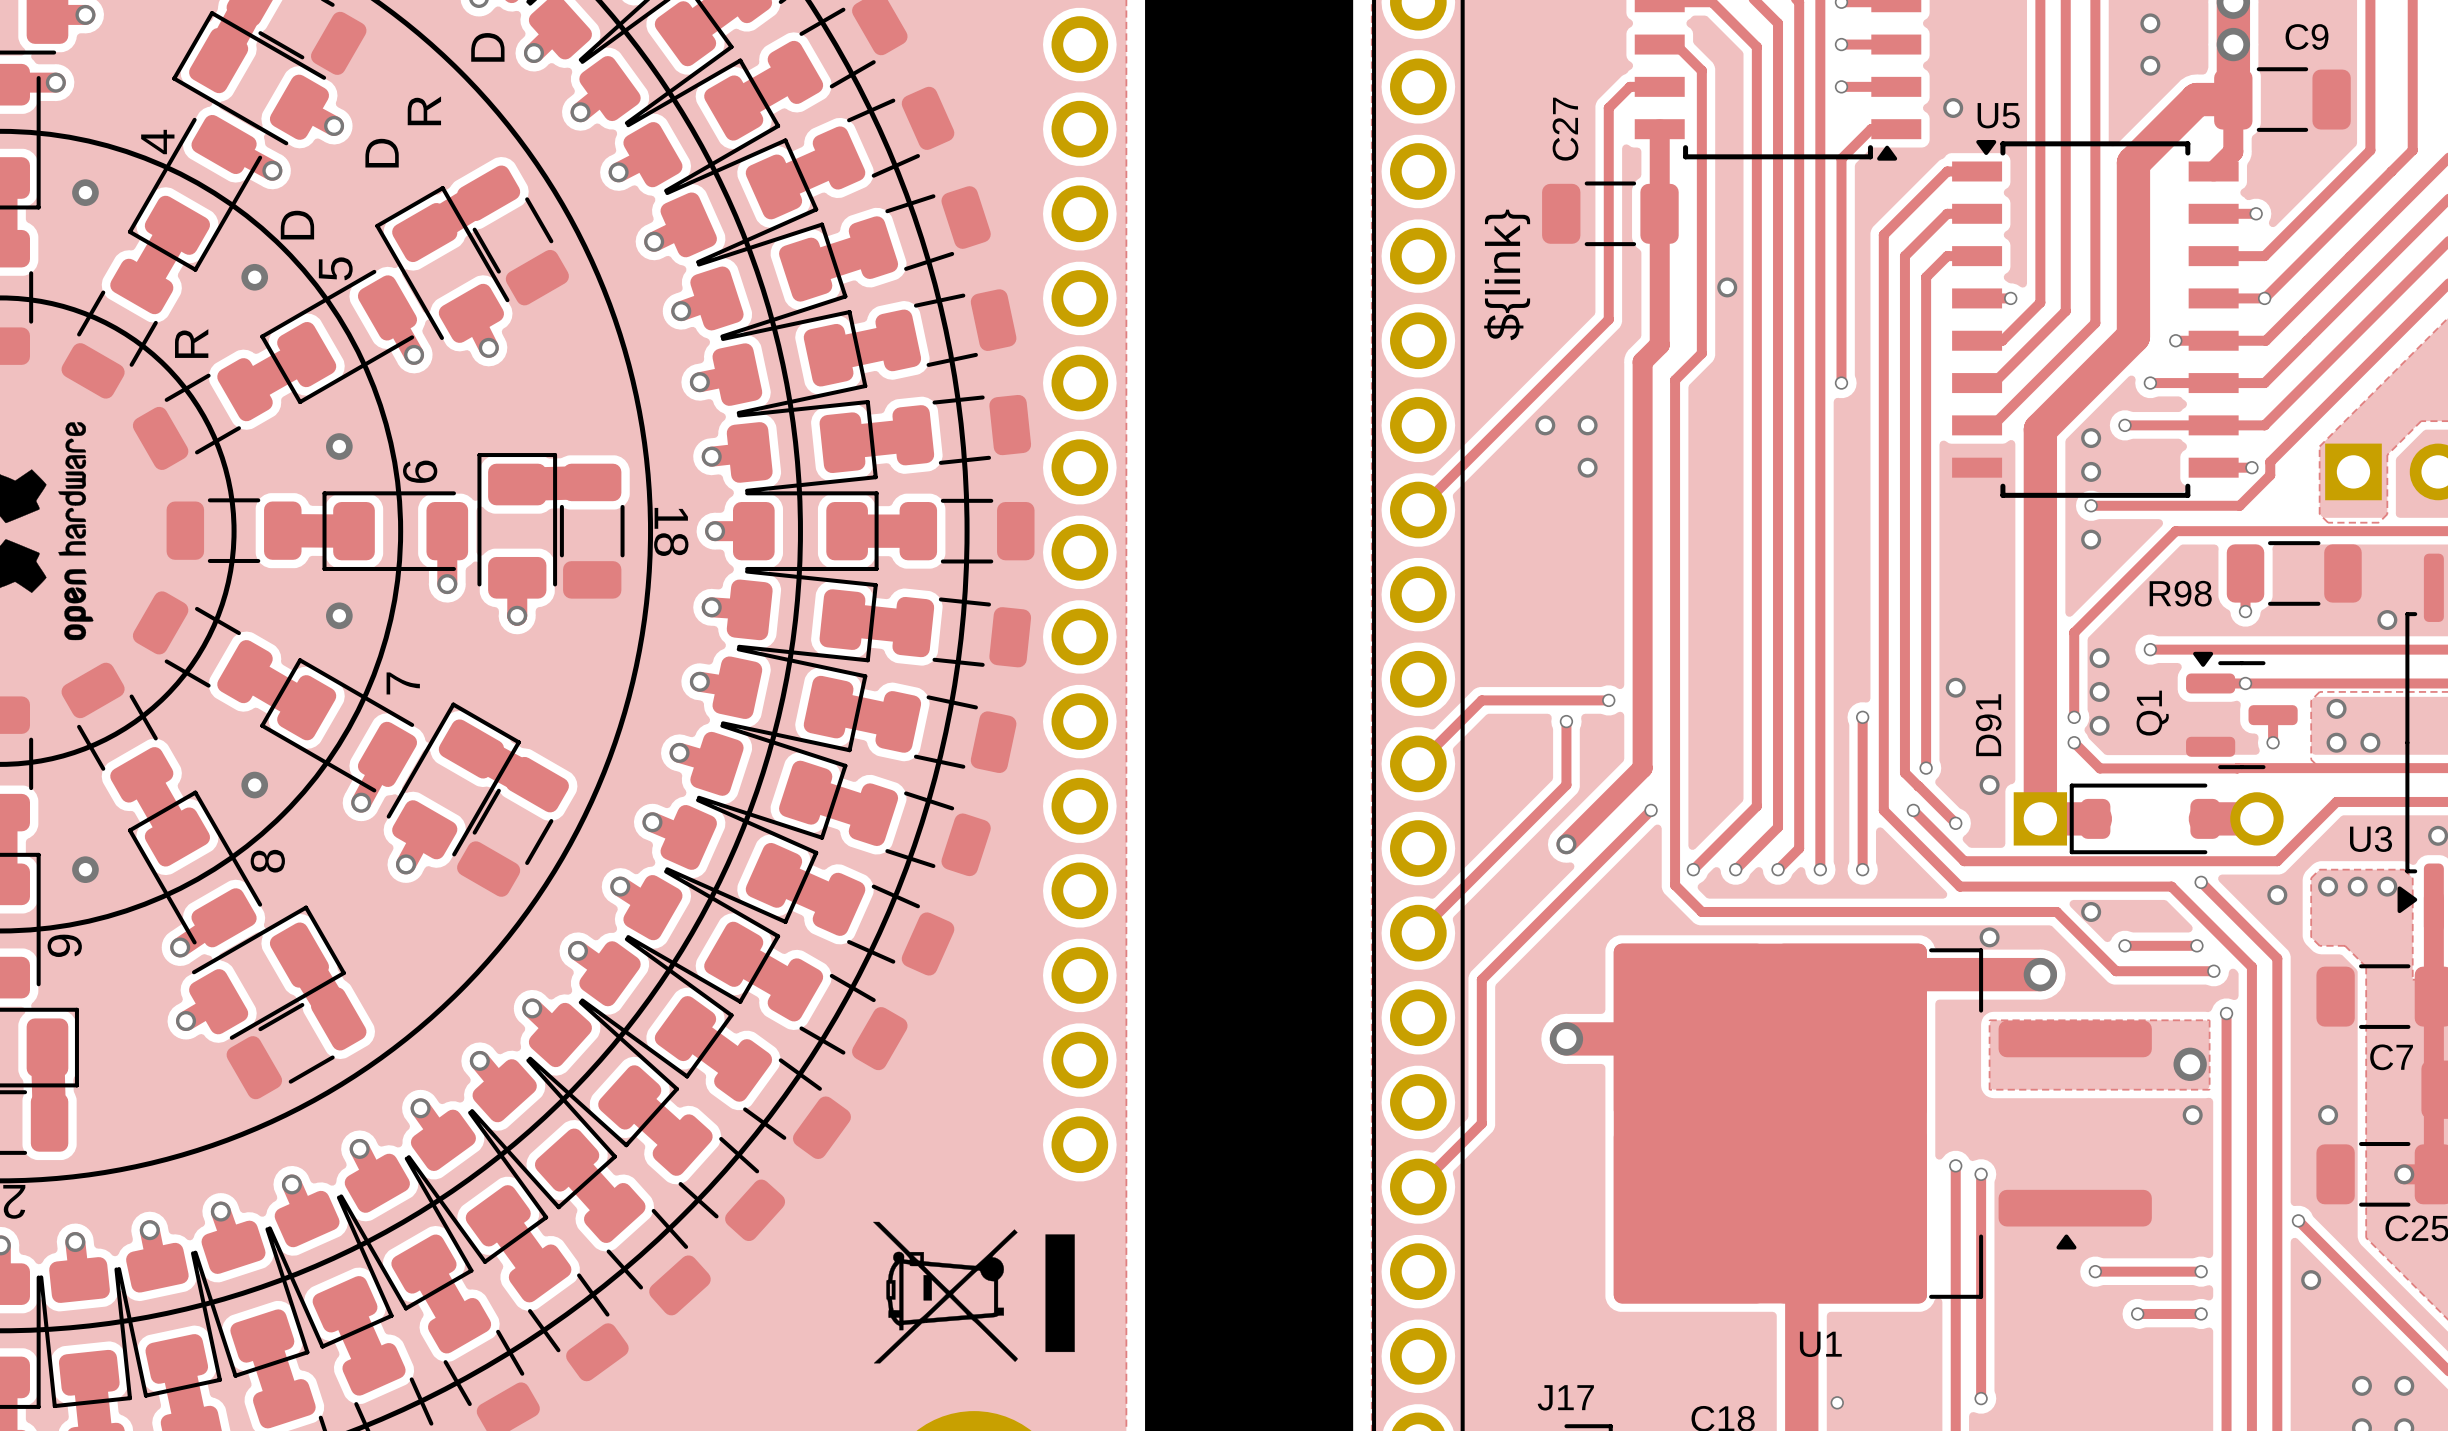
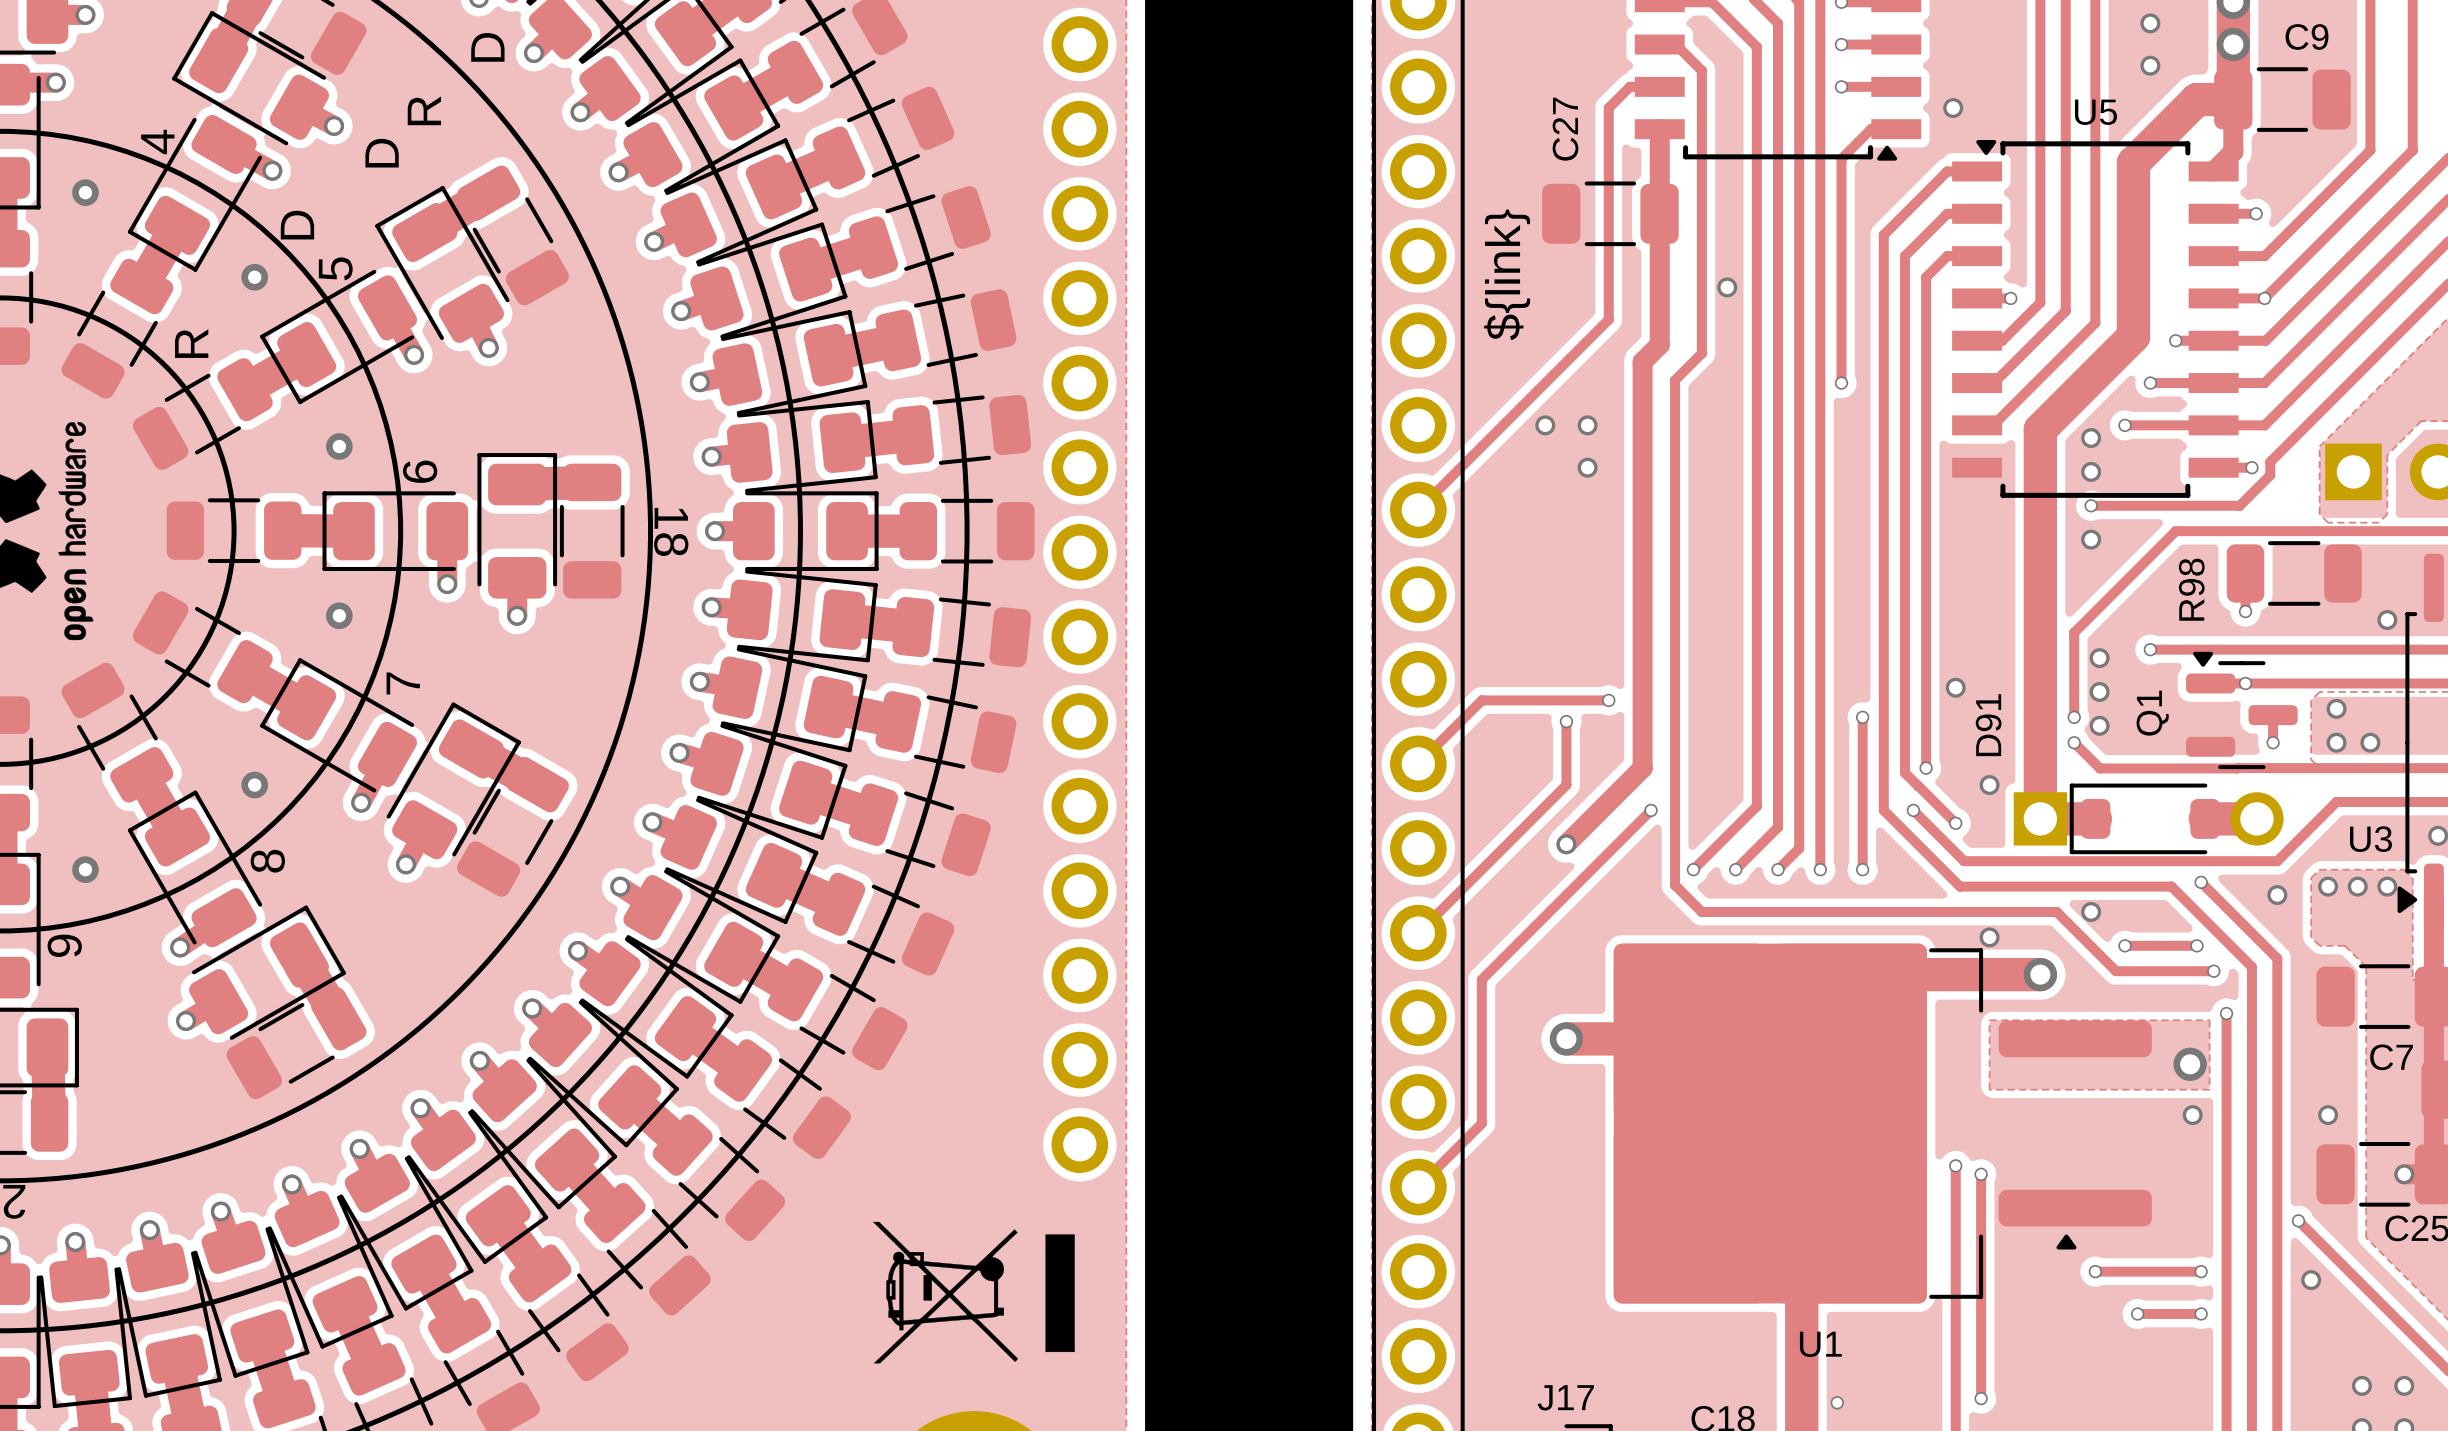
U5 name position: U5 (1998, 115) -> U5 (2096, 112)
R98 name rotation: 0° (2180, 593) -> 90° counterclockwise (2191, 589)

